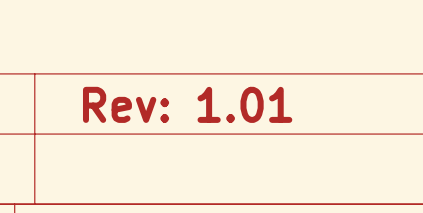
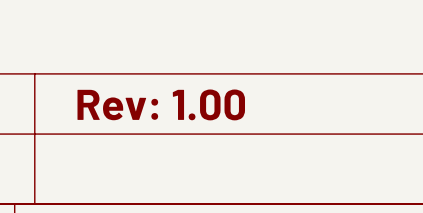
title block: Rev: 1.01 (187, 104) -> Rev: 1.00 (161, 104)

